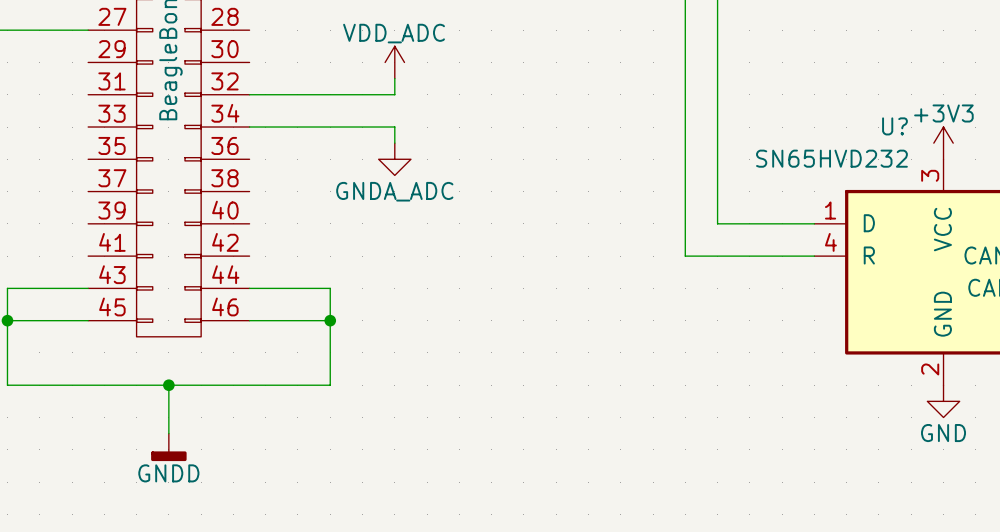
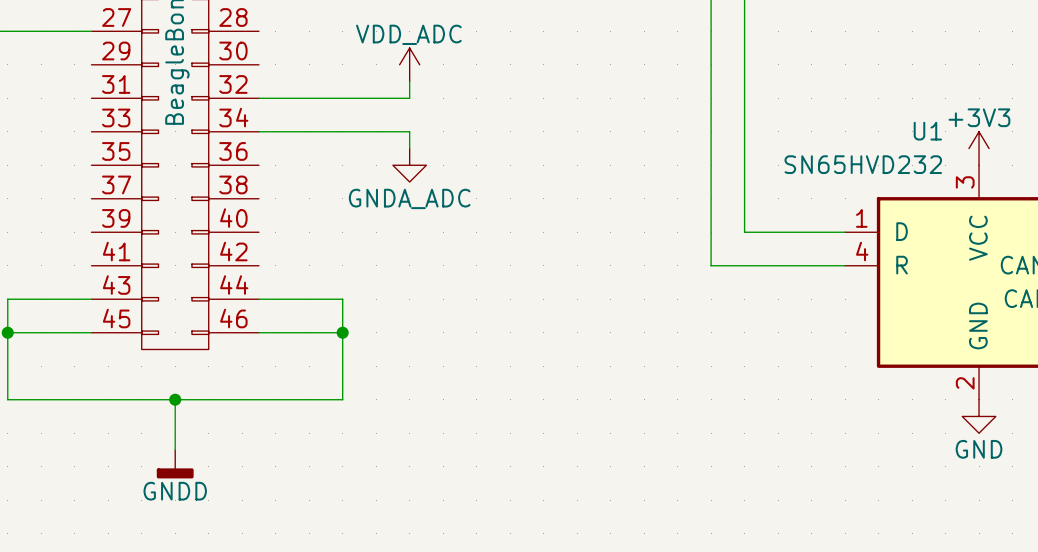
U? name: U? (894, 126) -> U1 (927, 131)

